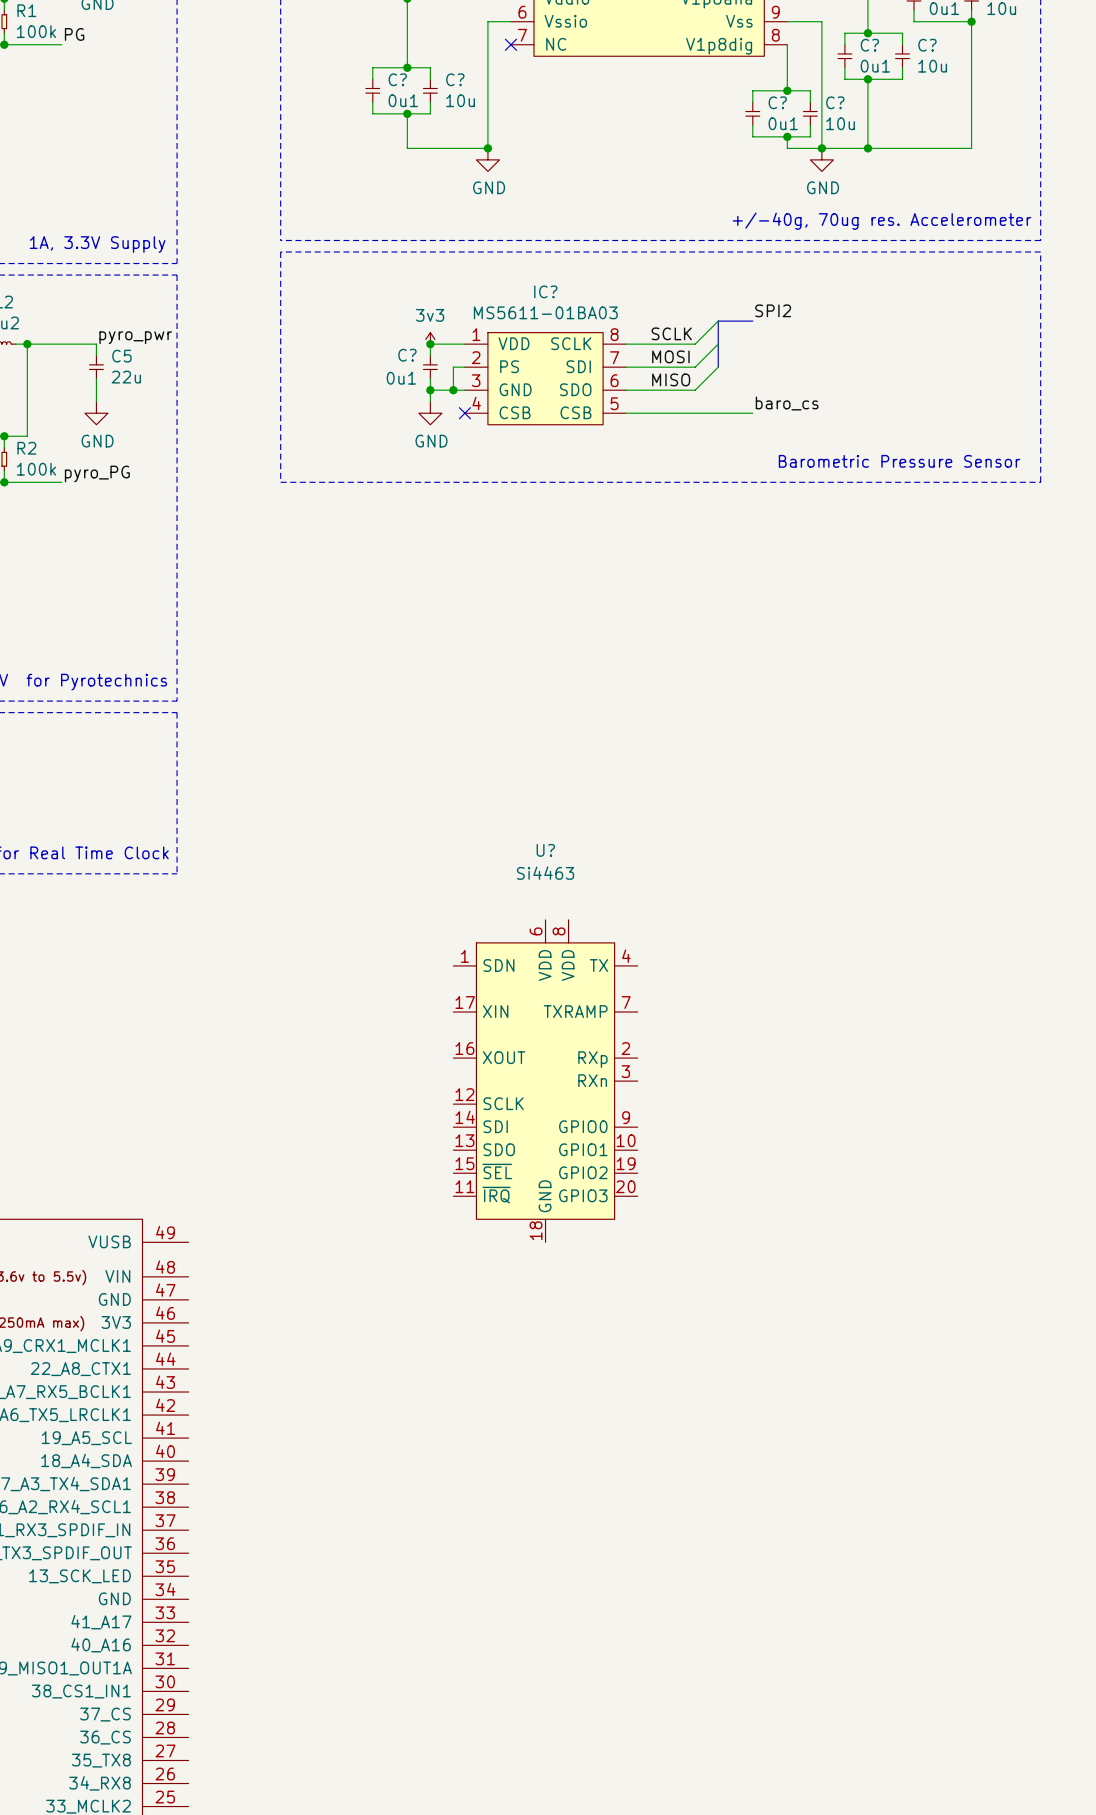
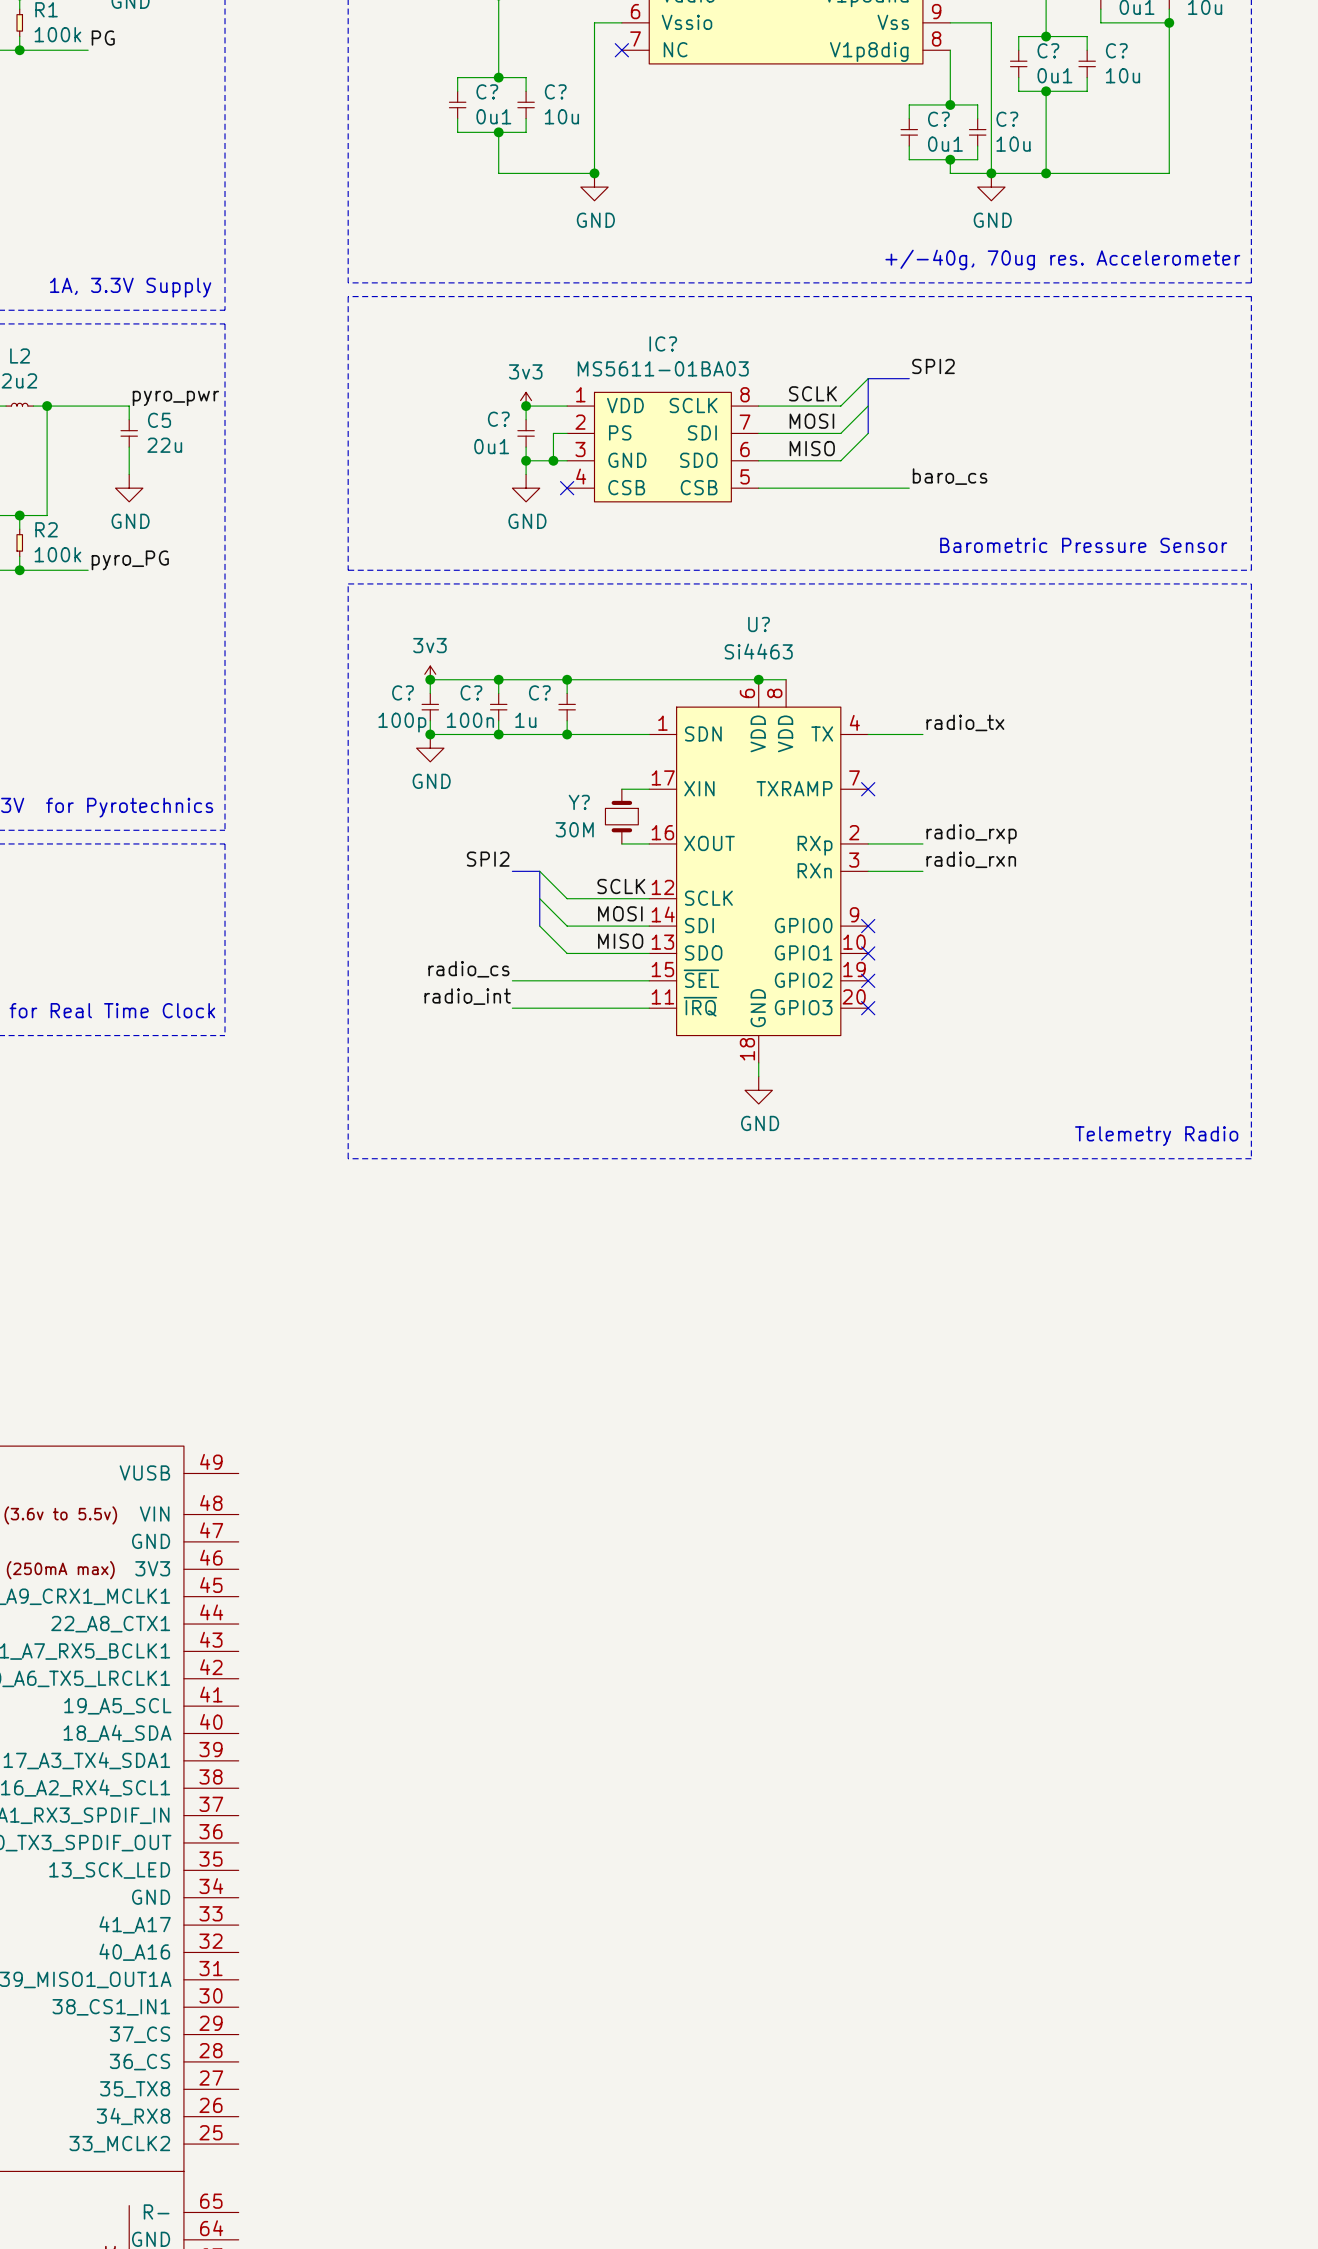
line: none -> (348, 583) (1251, 583) (1251, 1158) (348, 1158) (348, 583)
power symbol: none -> 3v3 (430, 672)
junction: none -> (430, 679)
wire: none -> (498, 679) (498, 693)
junction: none -> (498, 679)
wire: none -> (567, 679) (567, 693)
junction: none -> (567, 679)
junction: none -> (758, 679)
wire: none -> (786, 679) (430, 679) (430, 693)
C?: none -> 100p (430, 707)
C?: none -> 100n (498, 707)
C?: none -> 1u (567, 707)
wire: none -> (430, 720) (430, 734) (649, 734)
wire: none -> (498, 720) (498, 734)
wire: none -> (567, 720) (567, 734)
label: none -> radio_tx (965, 722)
junction: none -> (430, 734)
junction: none -> (498, 734)
junction: none -> (567, 734)
wire: none -> (868, 734) (922, 734)
power symbol: none -> GND (430, 748)
wire: none -> (621, 789) (649, 789)
no-connect mark: none -> (868, 789)
Y?: none -> 30M (621, 816)
label: none -> radio_rxp (971, 834)
wire: none -> (621, 843) (649, 843)
wire: none -> (868, 843) (922, 843)
label: none -> SPI2 (488, 859)
label: none -> radio_rxn (971, 859)
bus: none -> (512, 871) (539, 871) (539, 926)
wire: none -> (539, 871) (567, 898) (649, 898)
U?: none -> Si4463 (758, 871)
wire: none -> (868, 871) (922, 871)
label: none -> SCLK (621, 886)
wire: none -> (539, 898) (567, 926) (649, 926)
label: none -> MOSI (620, 913)
wire: none -> (539, 926) (567, 953) (649, 953)
no-connect mark: none -> (868, 926)
label: none -> MISO (620, 941)
no-connect mark: none -> (868, 953)
label: none -> radio_cs (468, 969)
wire: none -> (512, 980) (649, 980)
no-connect mark: none -> (868, 980)
label: none -> radio_int (467, 996)
wire: none -> (512, 1008) (649, 1008)
no-connect mark: none -> (868, 1008)
wire: none -> (758, 1062) (758, 1076)
power symbol: none -> GND (758, 1090)
text: none -> Telemetry Radio (1156, 1136)
U?: Si4463 (545, 1081) -> none

